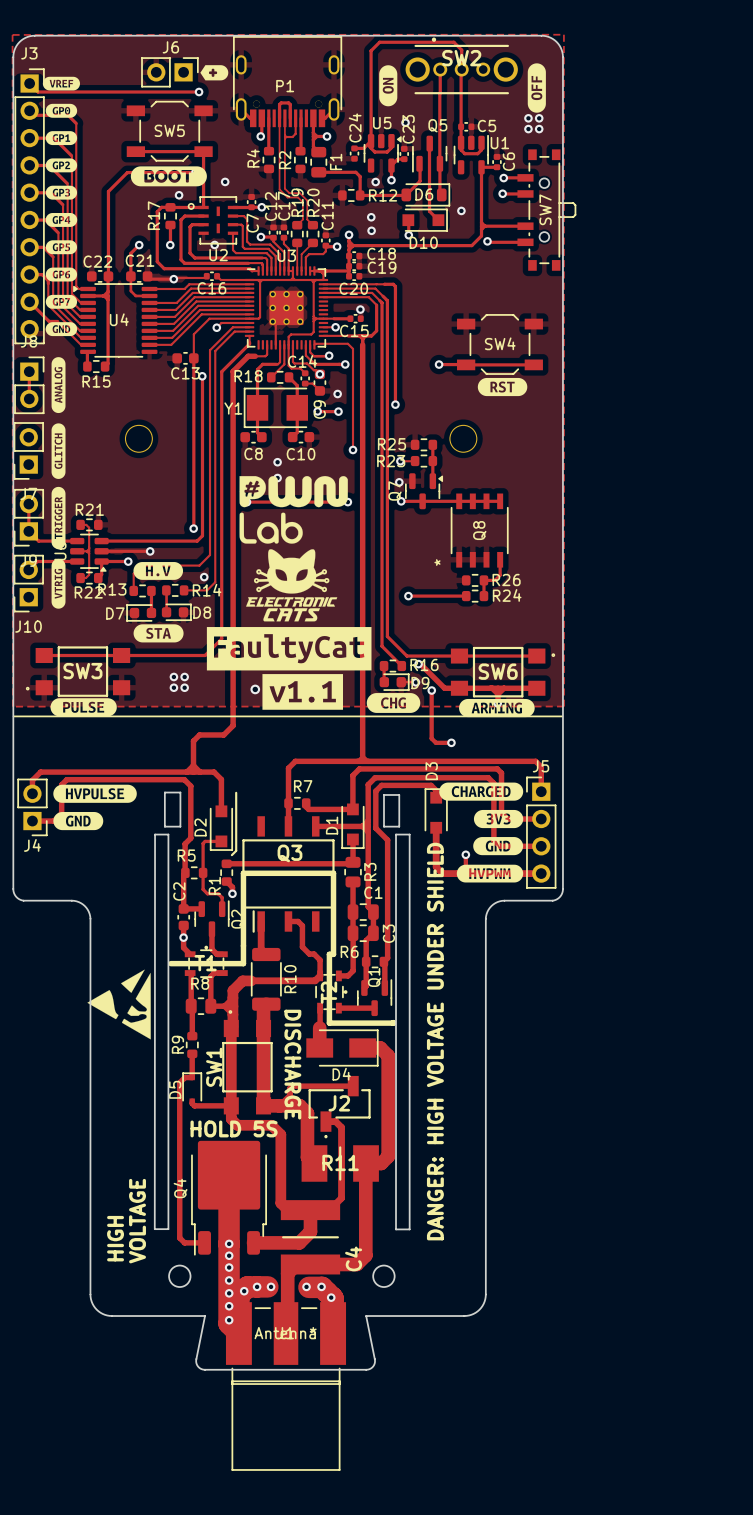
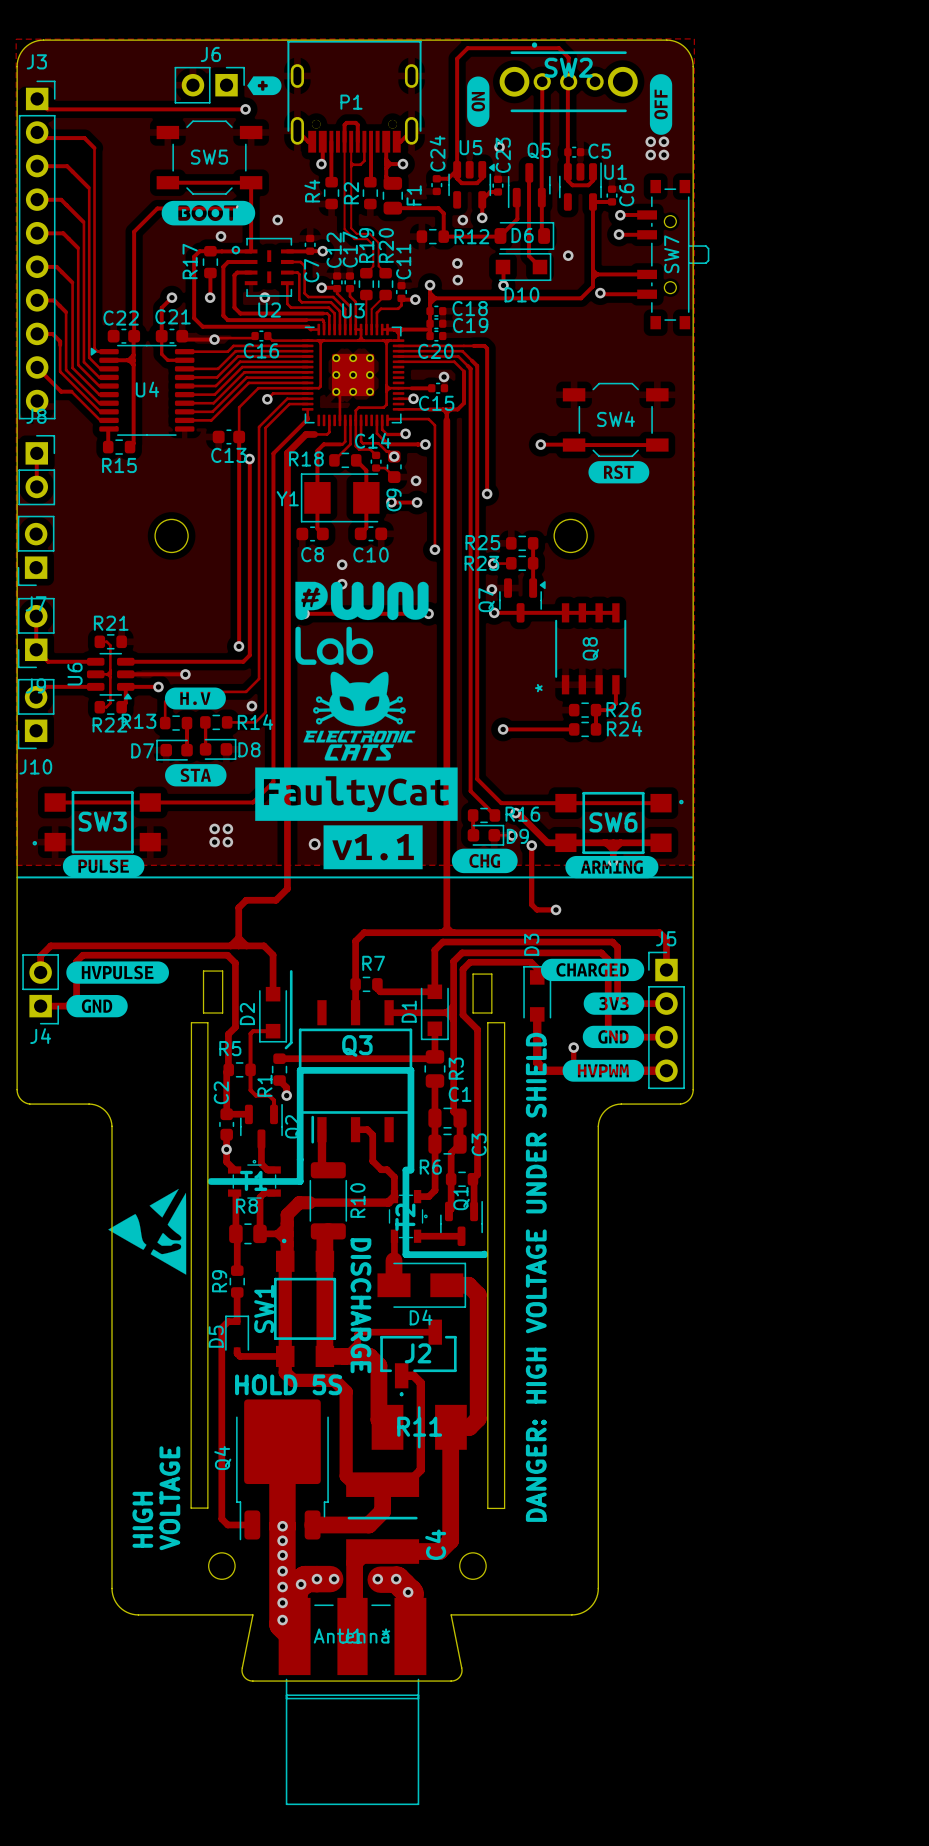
drawing: [42, 76, 80, 91] -> none
drawing: [45, 103, 78, 118] -> none
drawing: [45, 131, 78, 146] -> none
drawing: [45, 158, 78, 173] -> none
drawing: [45, 185, 78, 200] -> none
drawing: [45, 212, 78, 227] -> none
drawing: [45, 240, 78, 255] -> none
drawing: [45, 267, 78, 282] -> none
drawing: [45, 294, 78, 309] -> none
drawing: [45, 322, 78, 337] -> none
drawing: [51, 357, 66, 609] -> none

